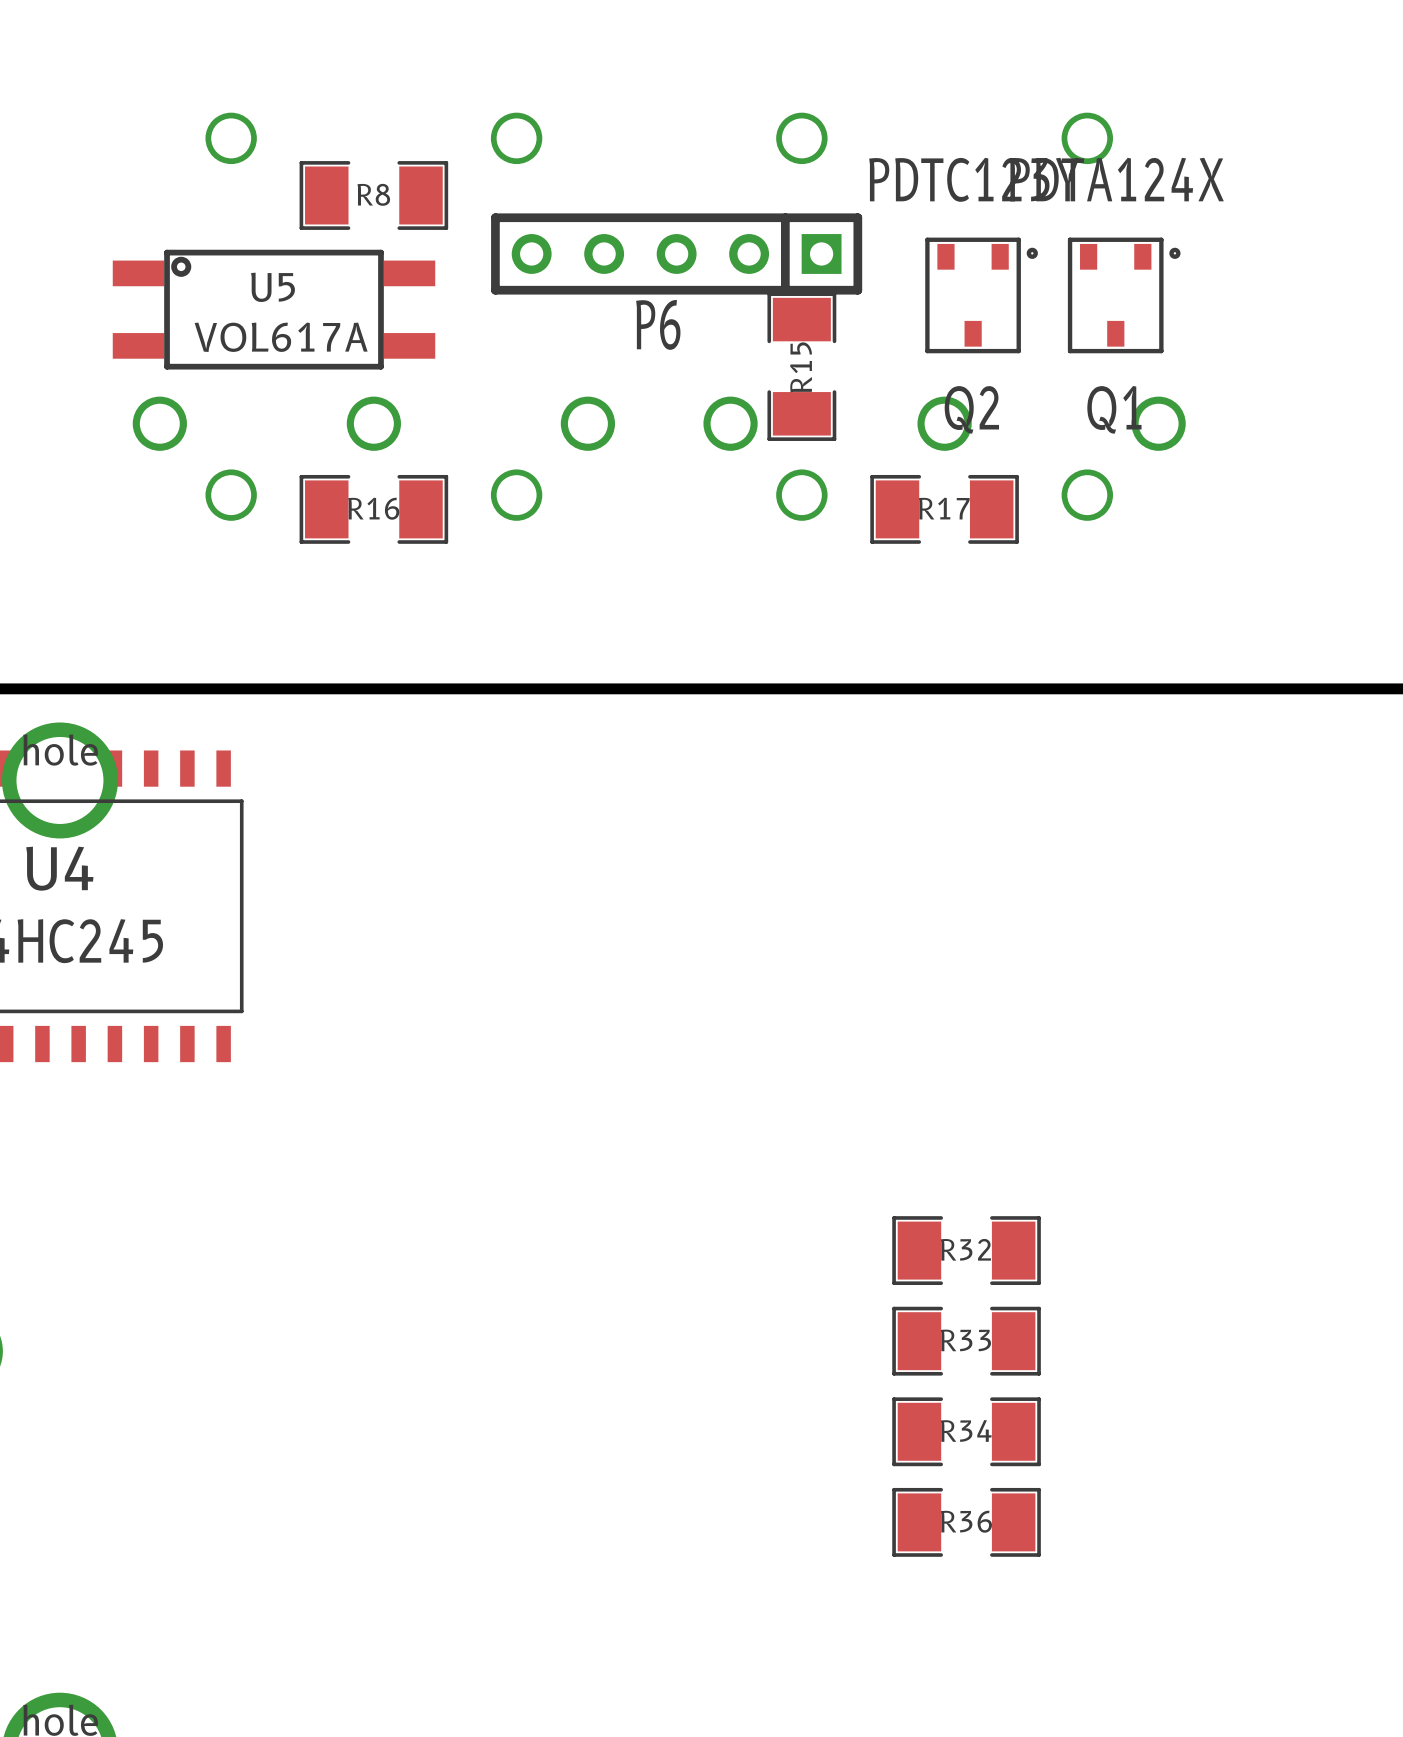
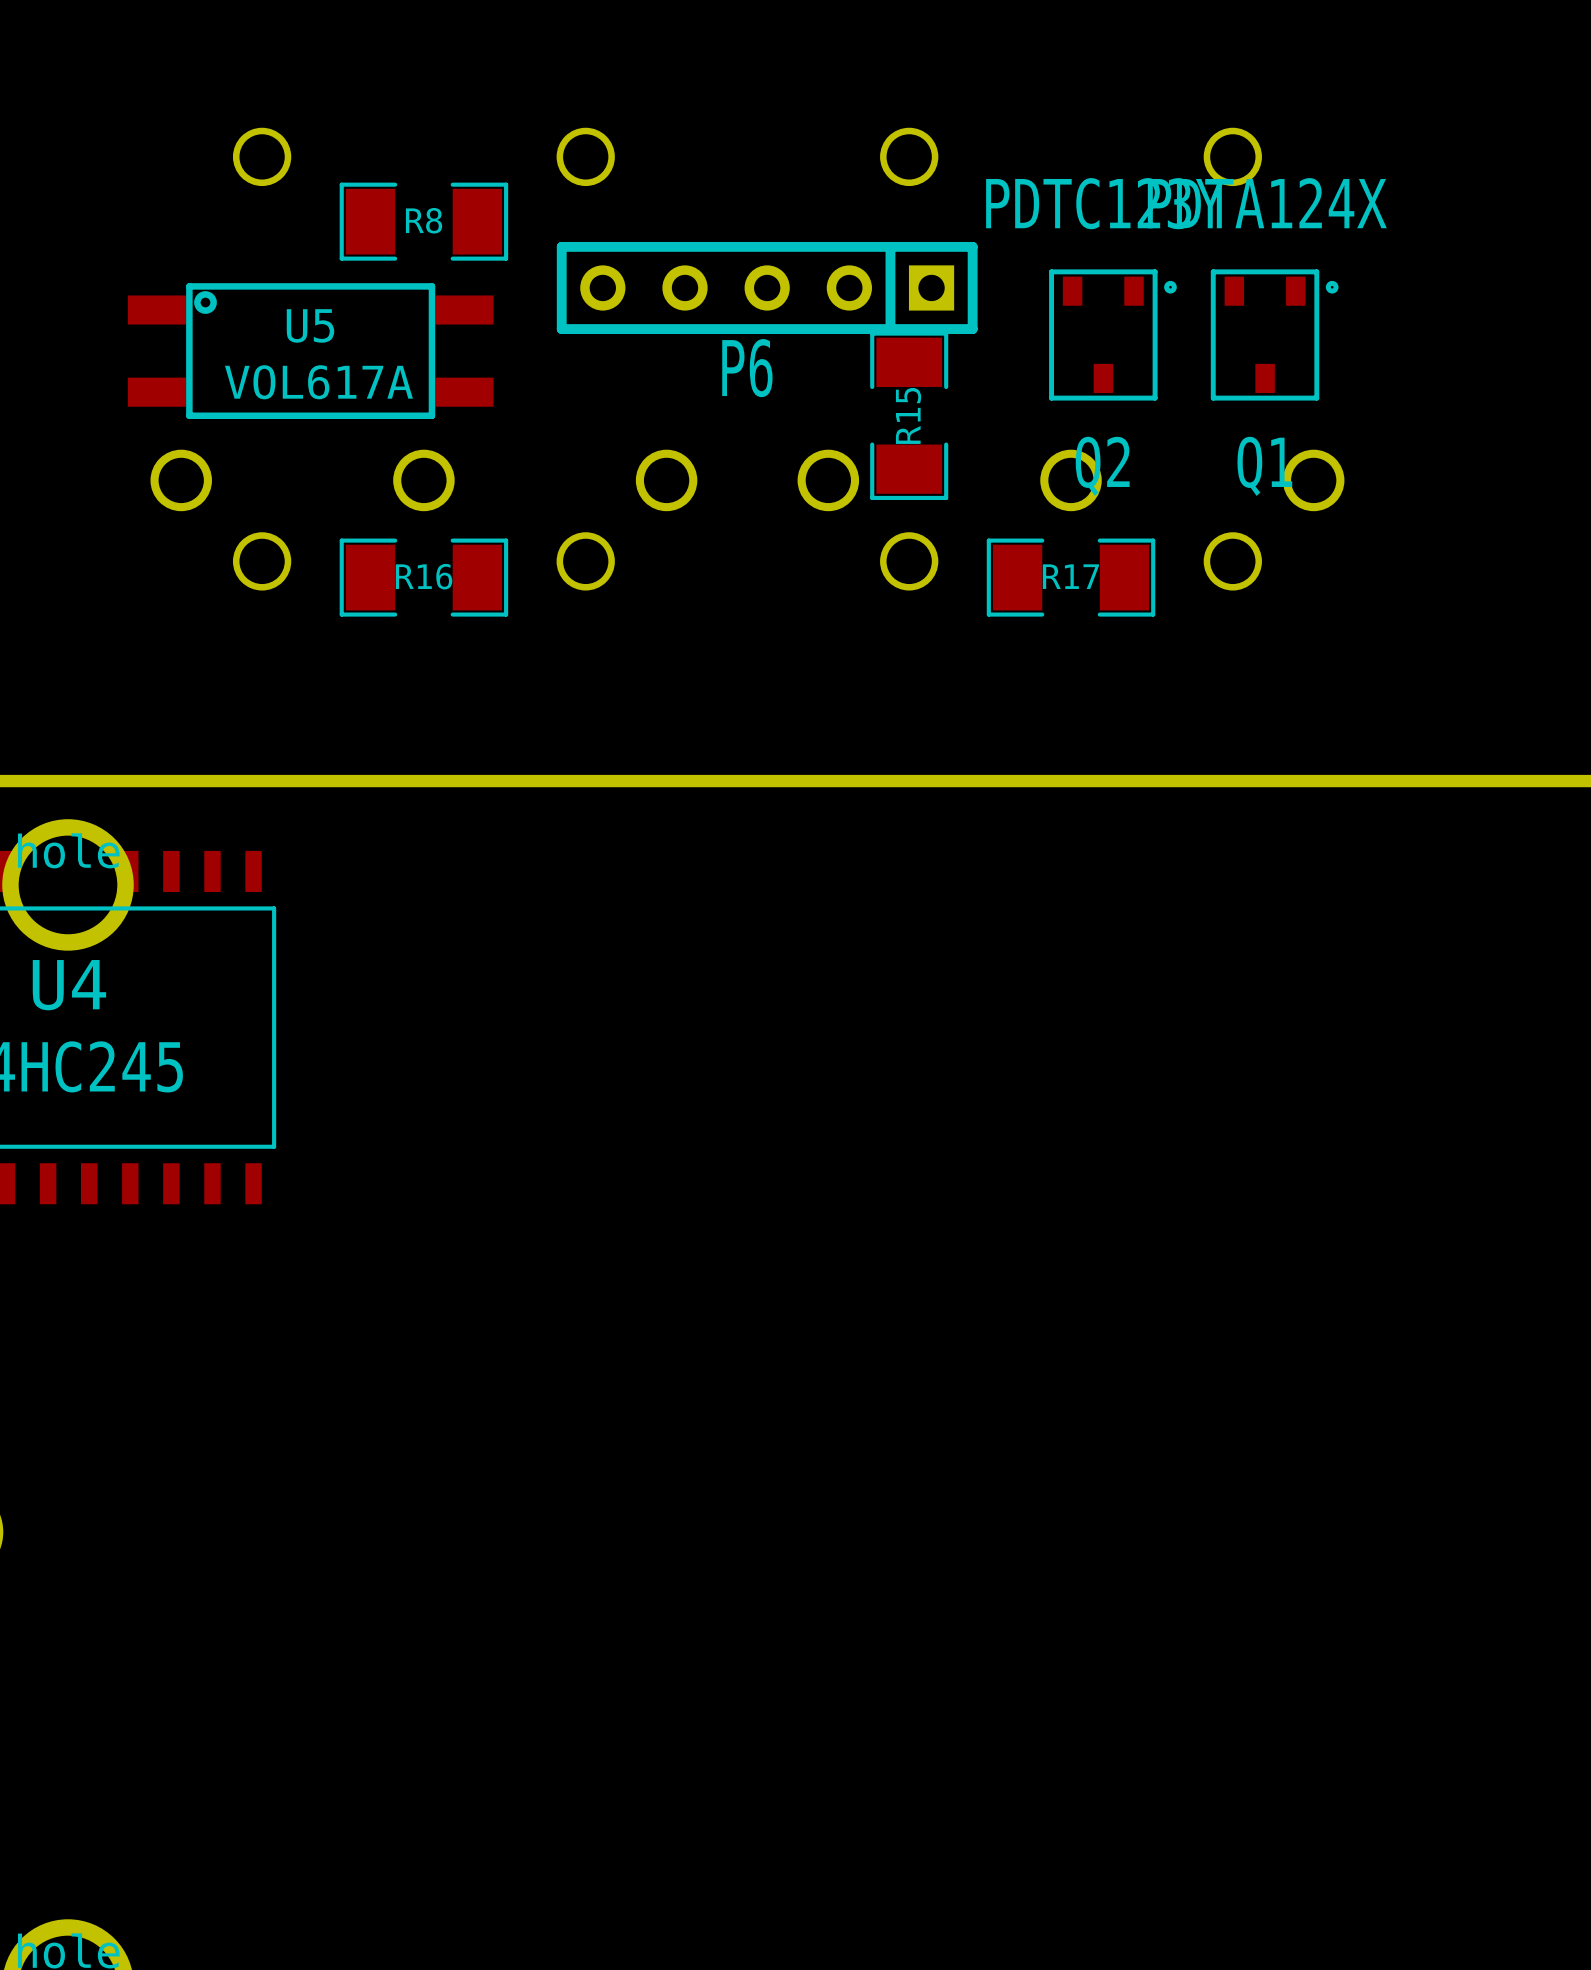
R32: (966, 1250) -> none
R33: (966, 1341) -> none
R34: (966, 1431) -> none
R36: (966, 1522) -> none

